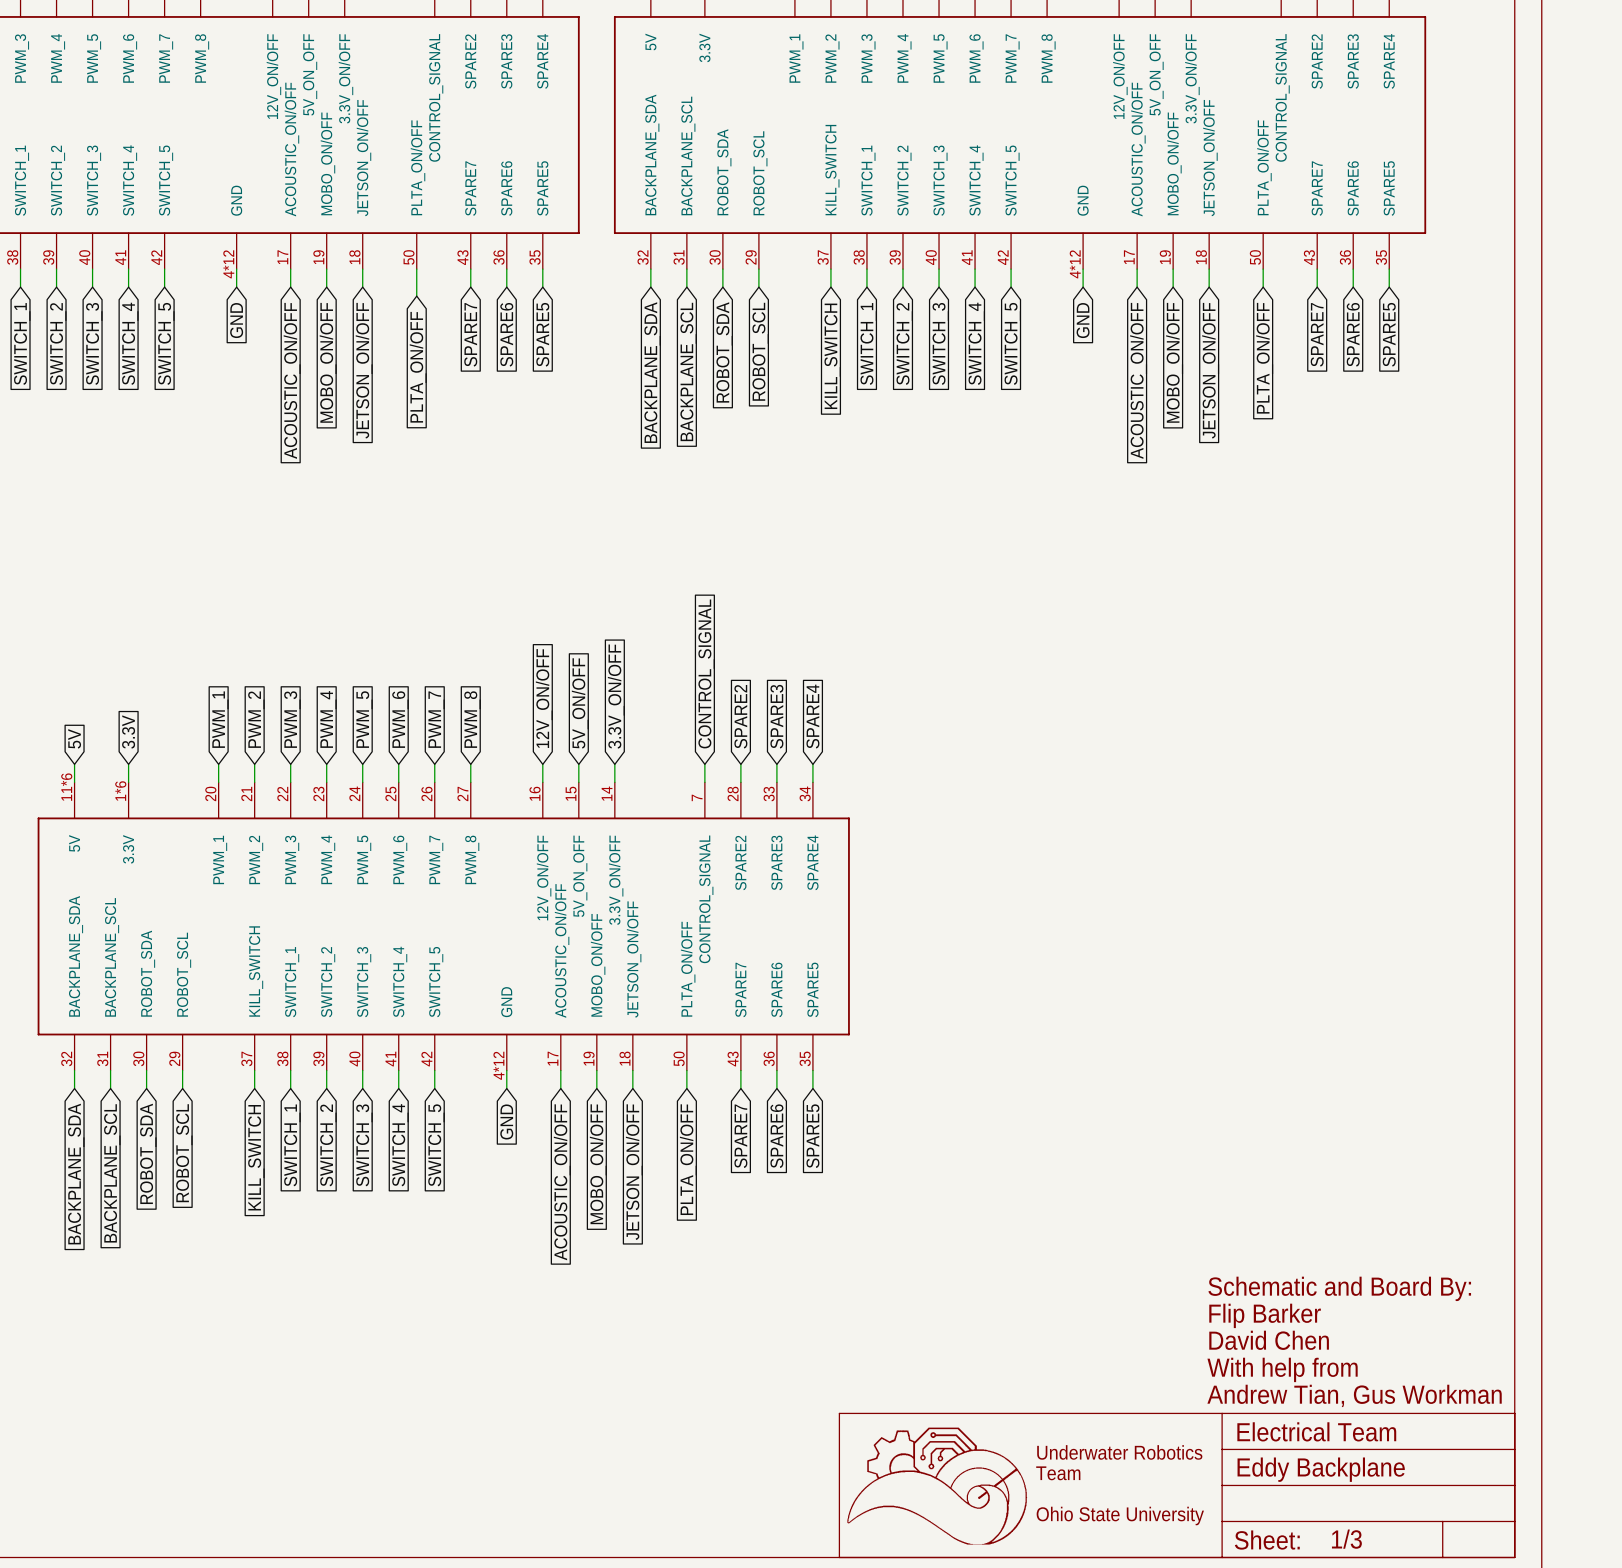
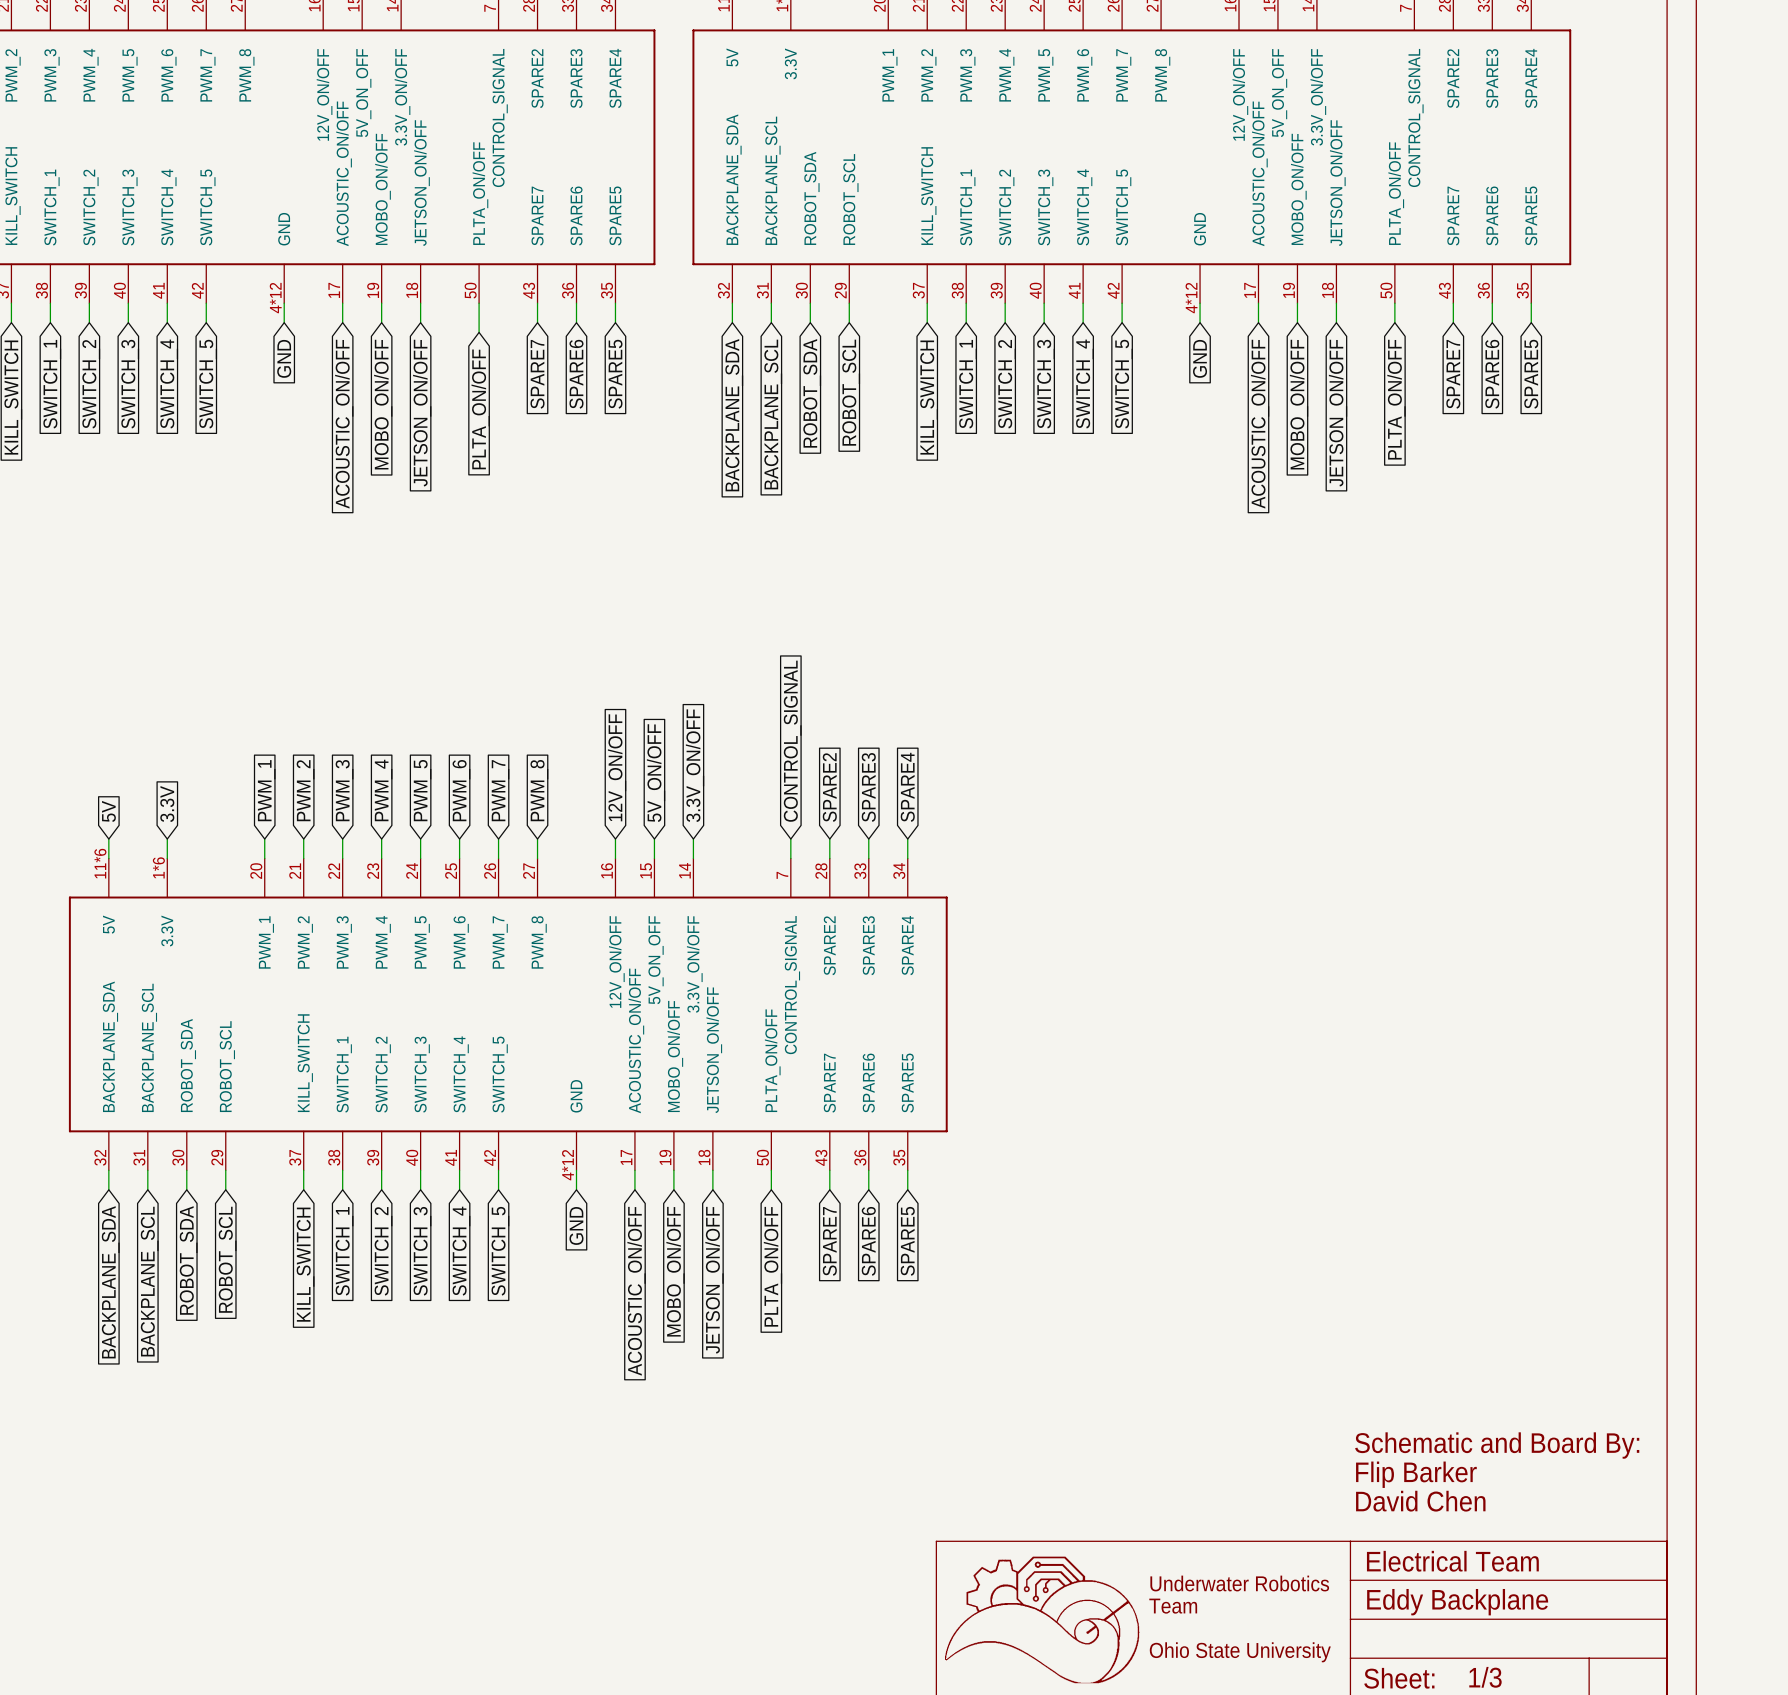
text position: Schematic and Board By: (1339, 1288) -> Schematic and Board By: (1497, 1445)
text position: Flip Barker (1265, 1315) -> Flip Barker (1416, 1474)
text position: David Chen (1269, 1340) -> David Chen (1420, 1501)
text: With help from (1282, 1369) -> none
text: Andrew Tian, Gus Workman (1354, 1395) -> none

